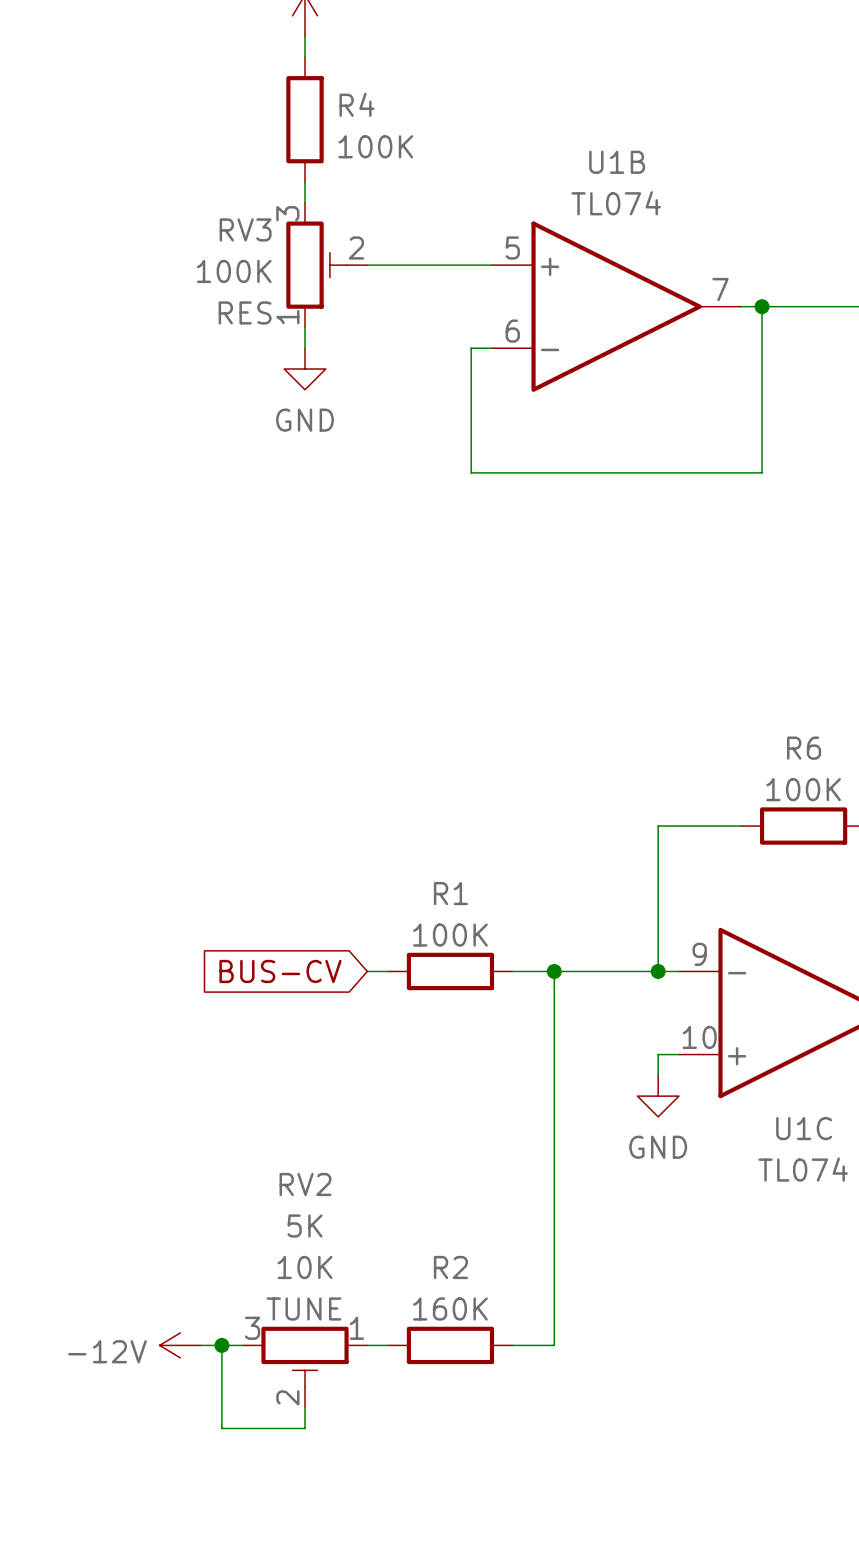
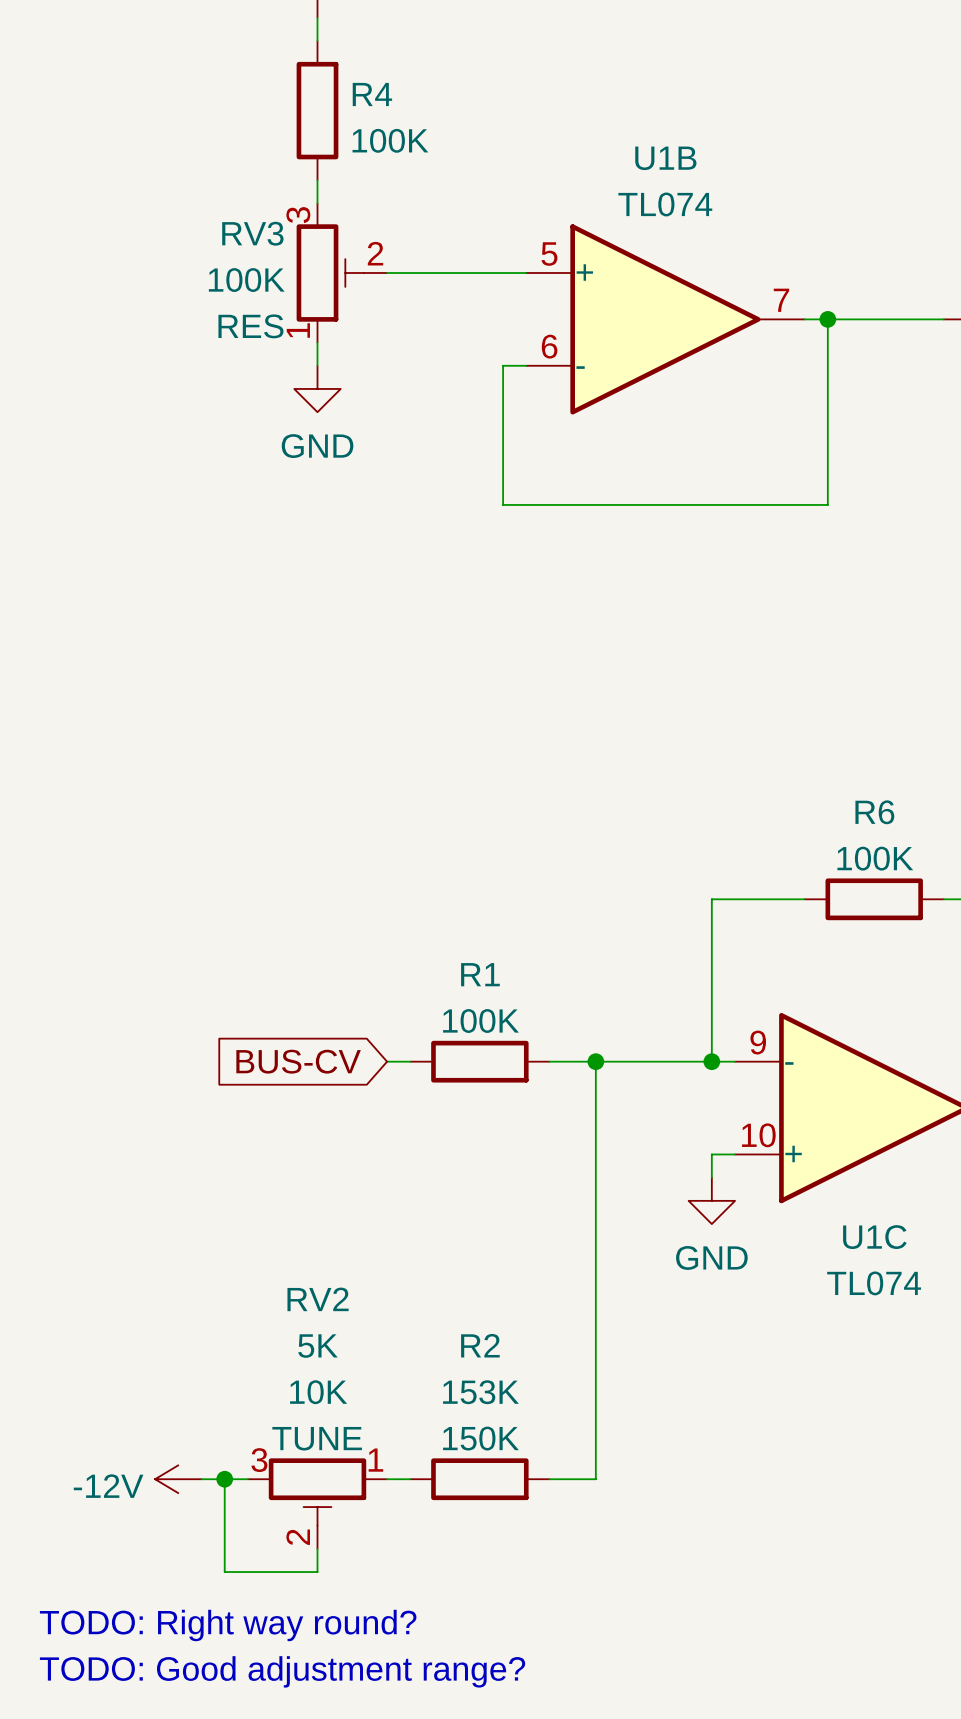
R2 name position: R2 (450, 1267) -> R2 (480, 1345)
R2 text: none -> 150K (480, 1438)
R2 value: 160K (450, 1309) -> 153K (480, 1392)
text: none -> TODO: Right way round? (228, 1625)
text: none -> TODO: Good adjustment range? (282, 1671)

